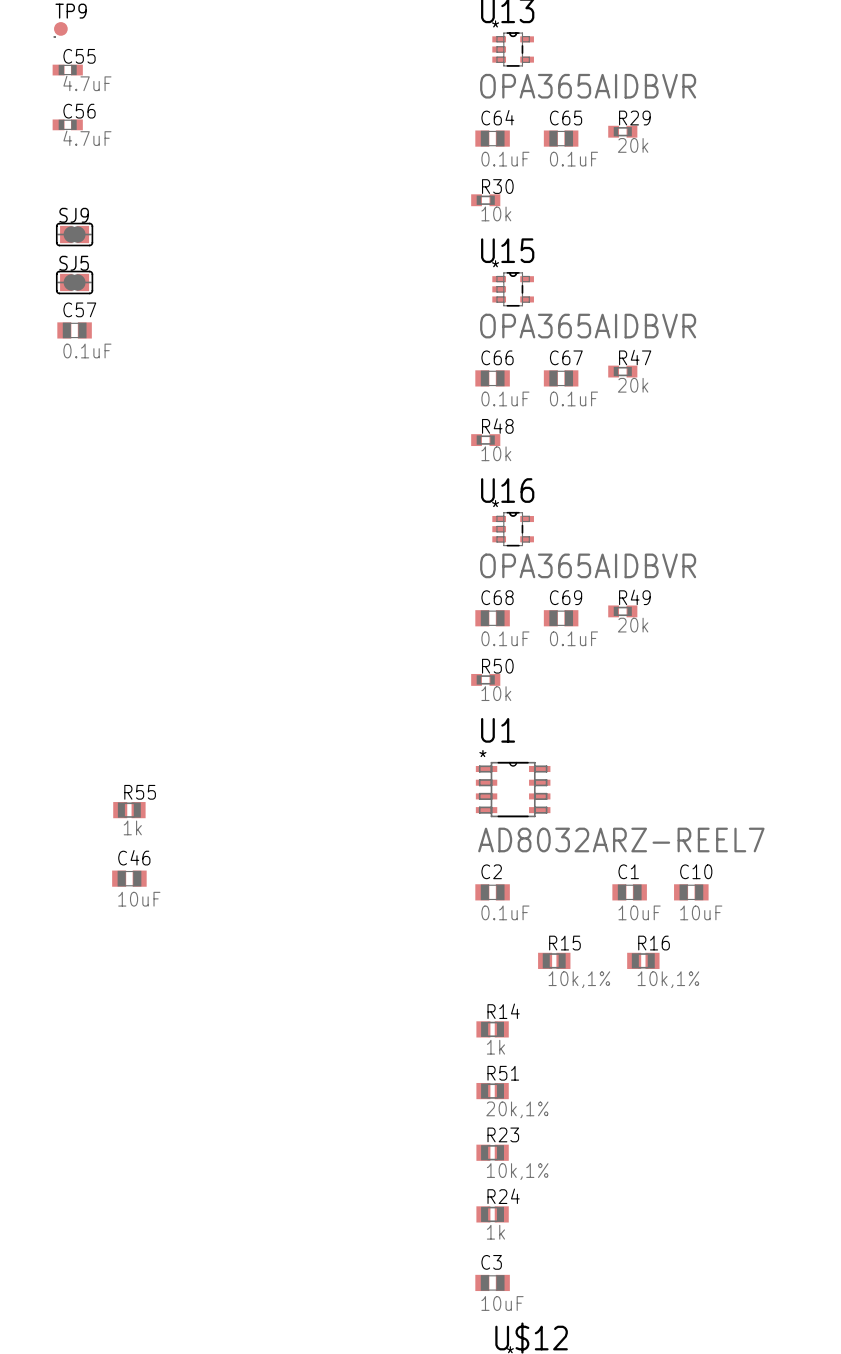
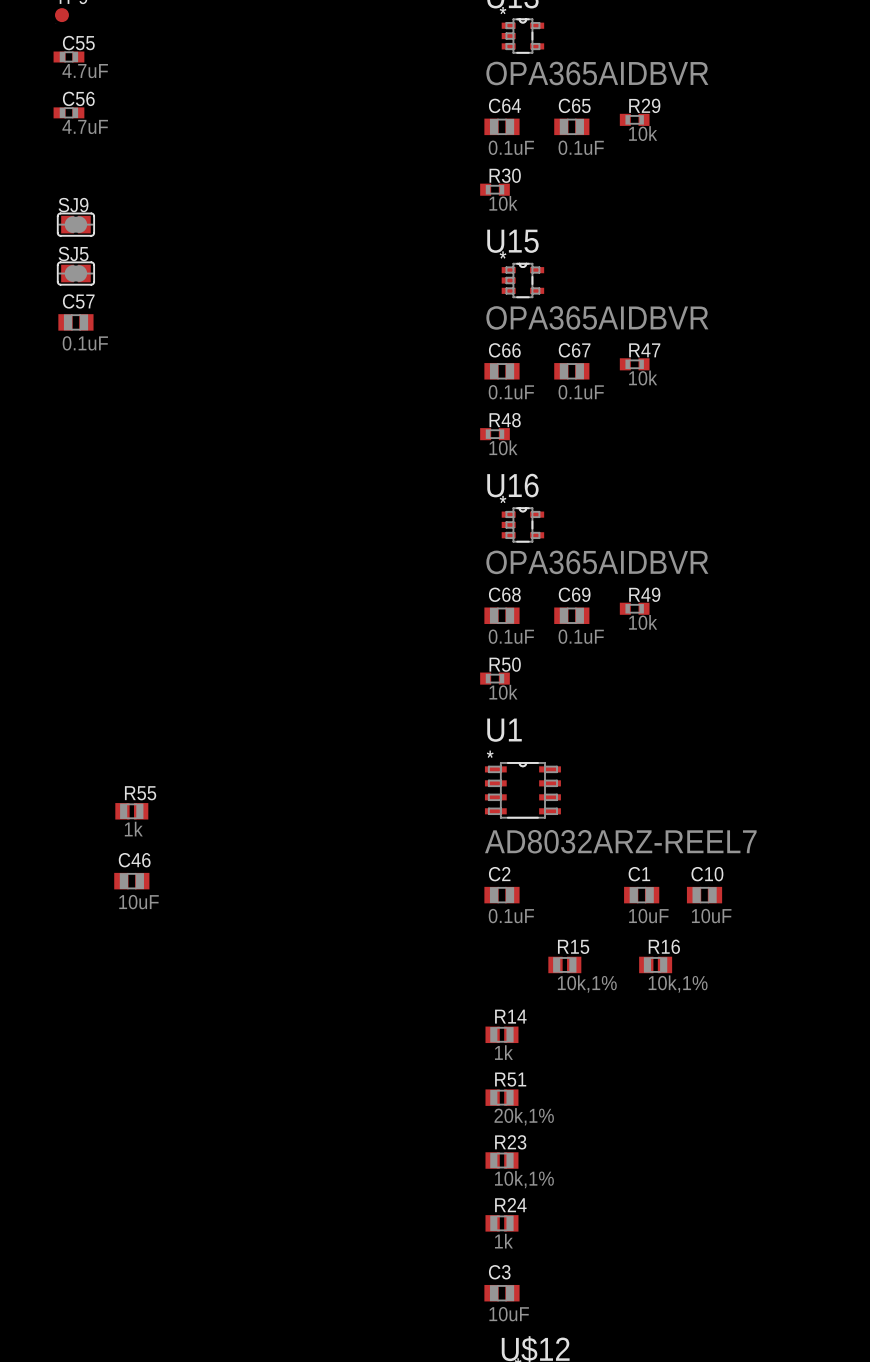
R29 value: 20k (633, 145) -> 10k (643, 133)
R47 value: 20k (633, 385) -> 10k (643, 378)
R49 value: 20k (633, 625) -> 10k (643, 622)

